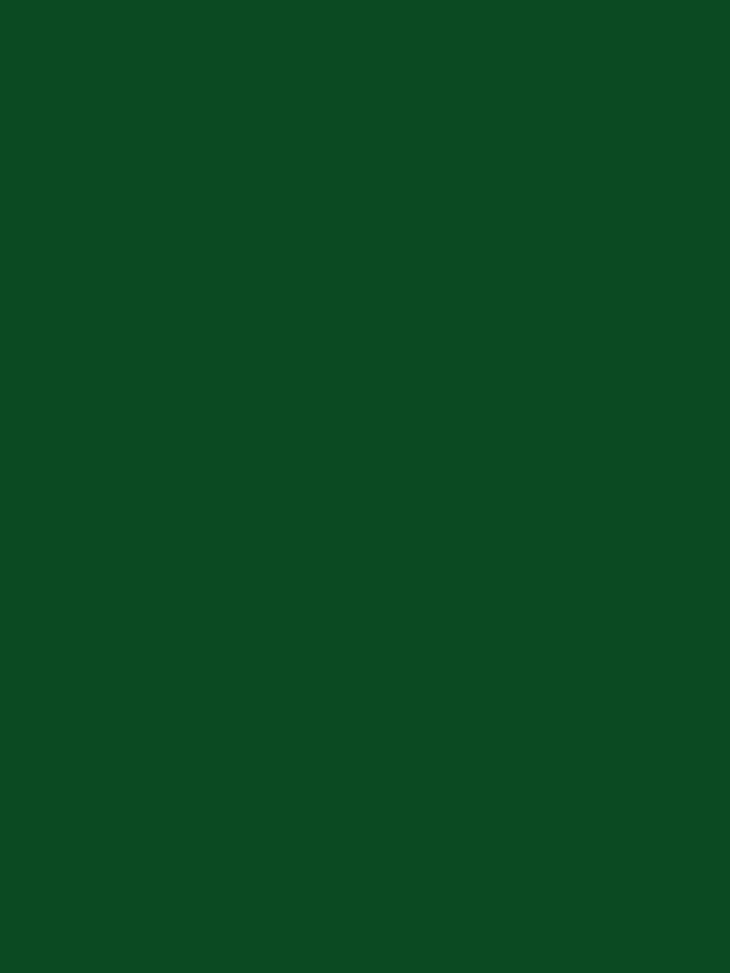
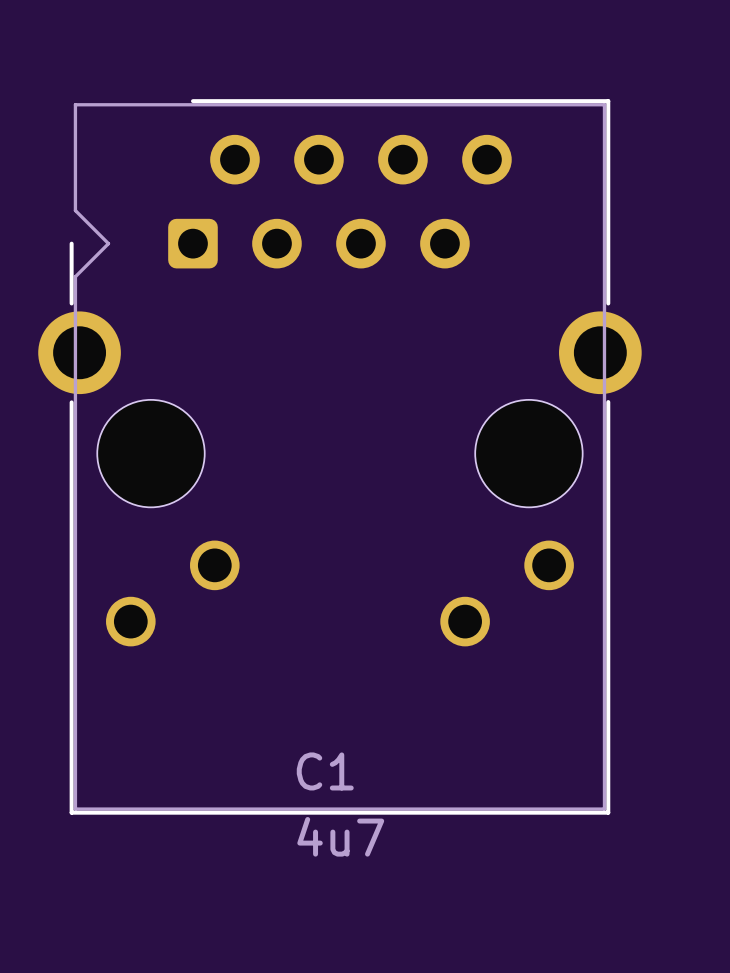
C1: none -> 4u7 (339, 456)

